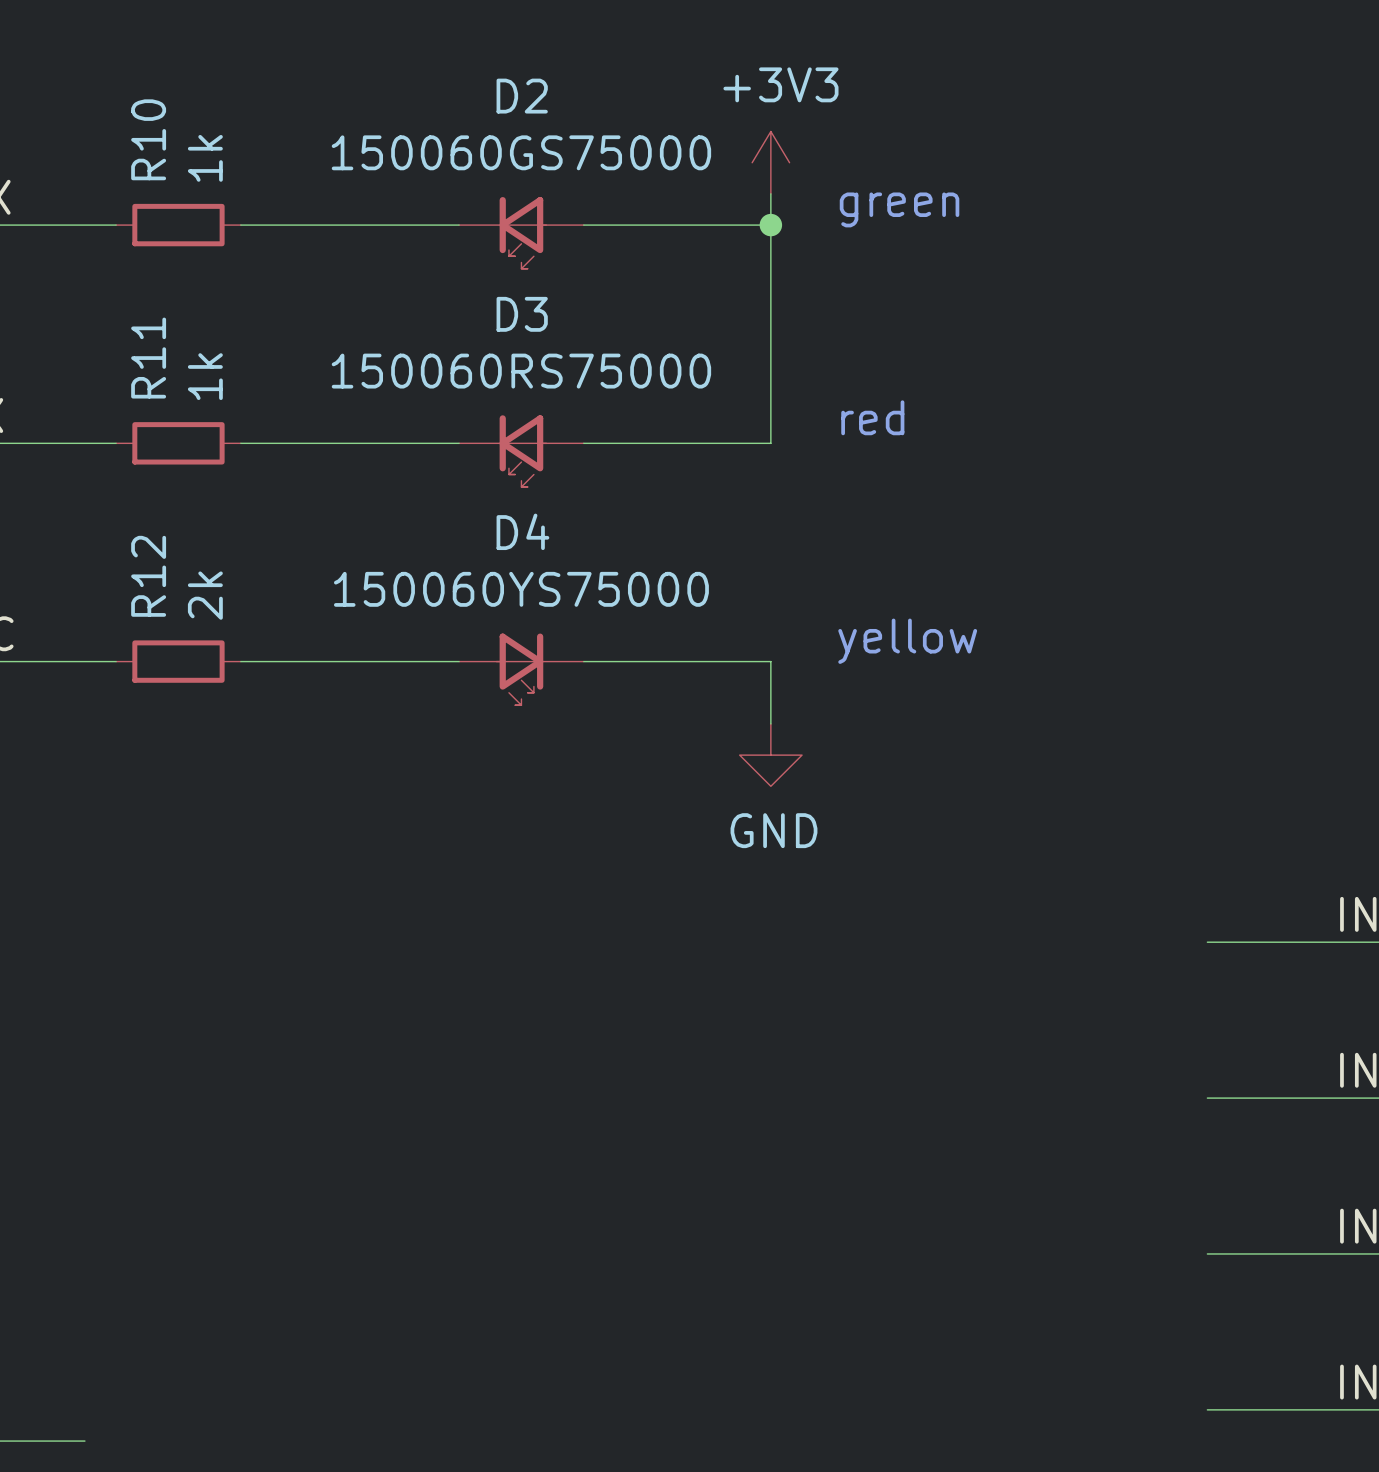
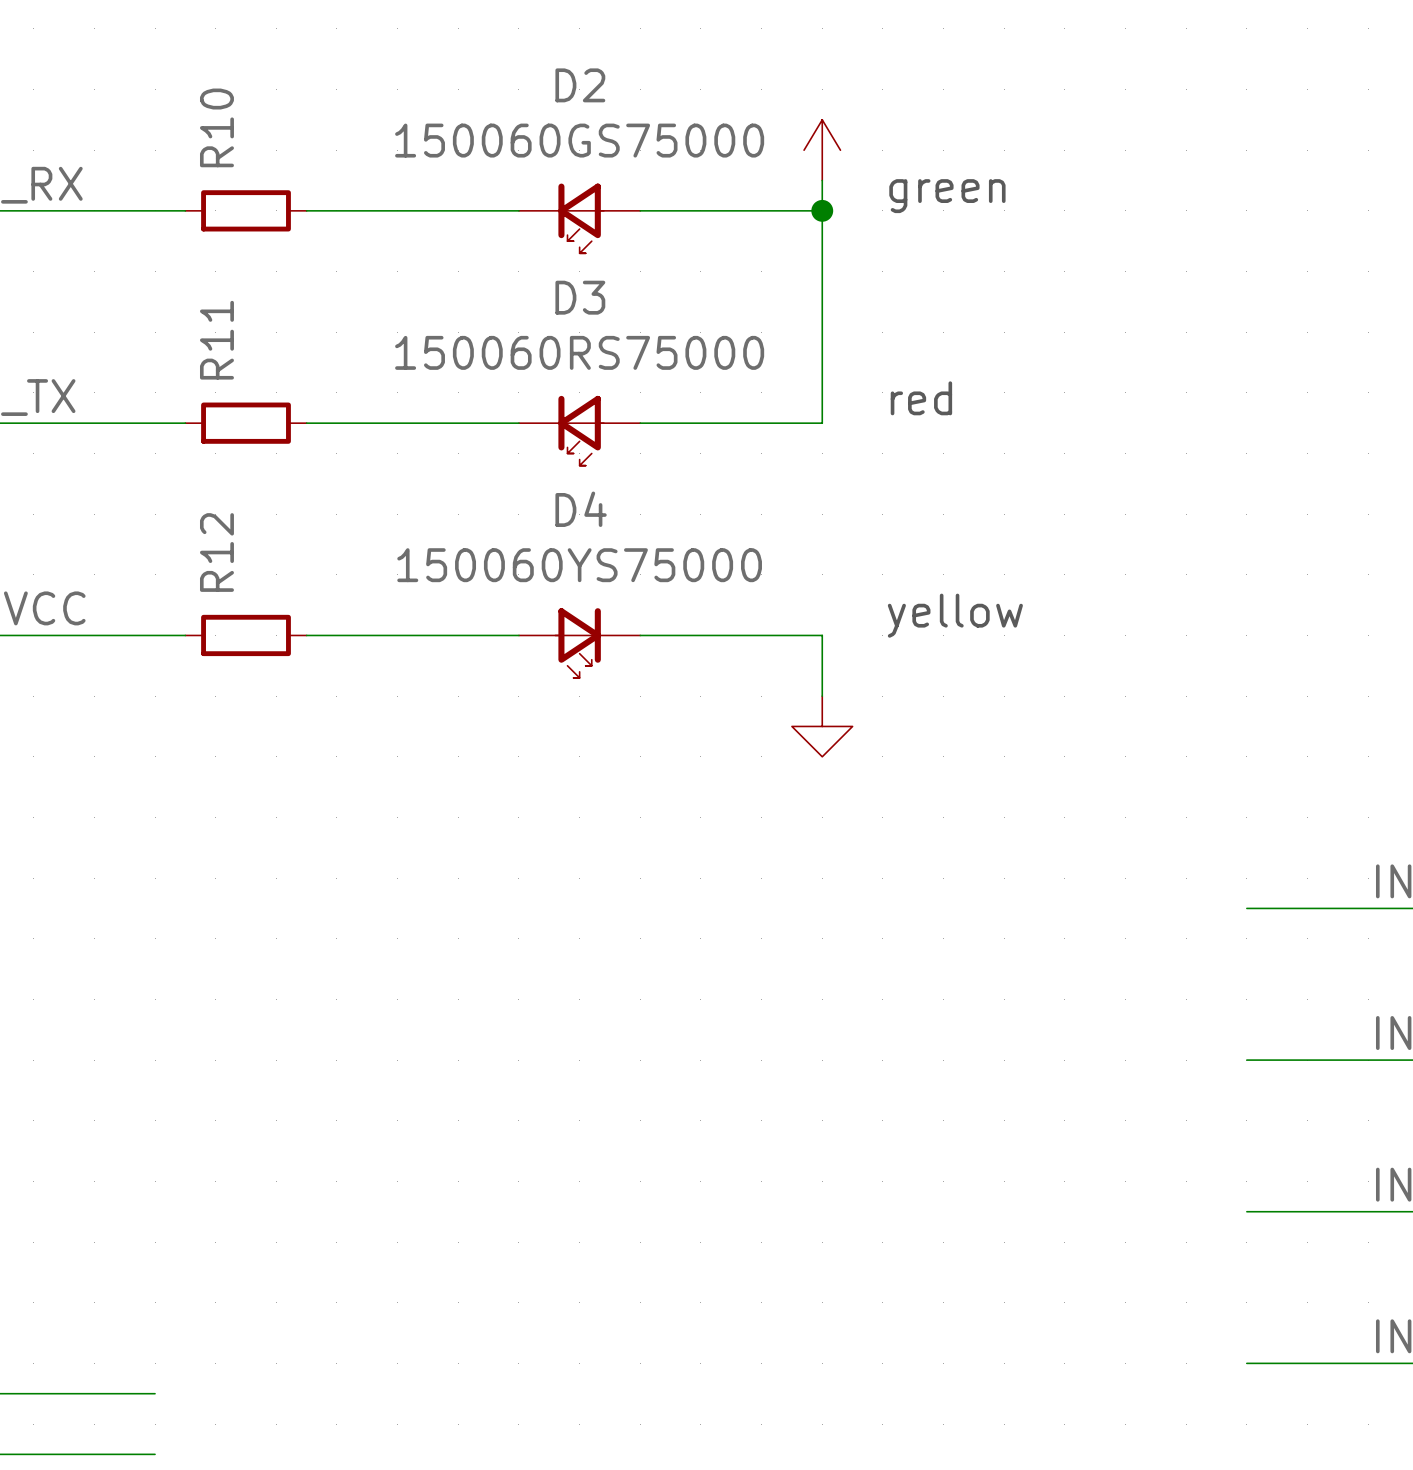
power symbol text: +3V3 (780, 84) -> none
R10 value: 1k (205, 158) -> none
R11 value: 1k (205, 376) -> none
R12 value: 2k (205, 595) -> none
power symbol text: GND (773, 830) -> none

